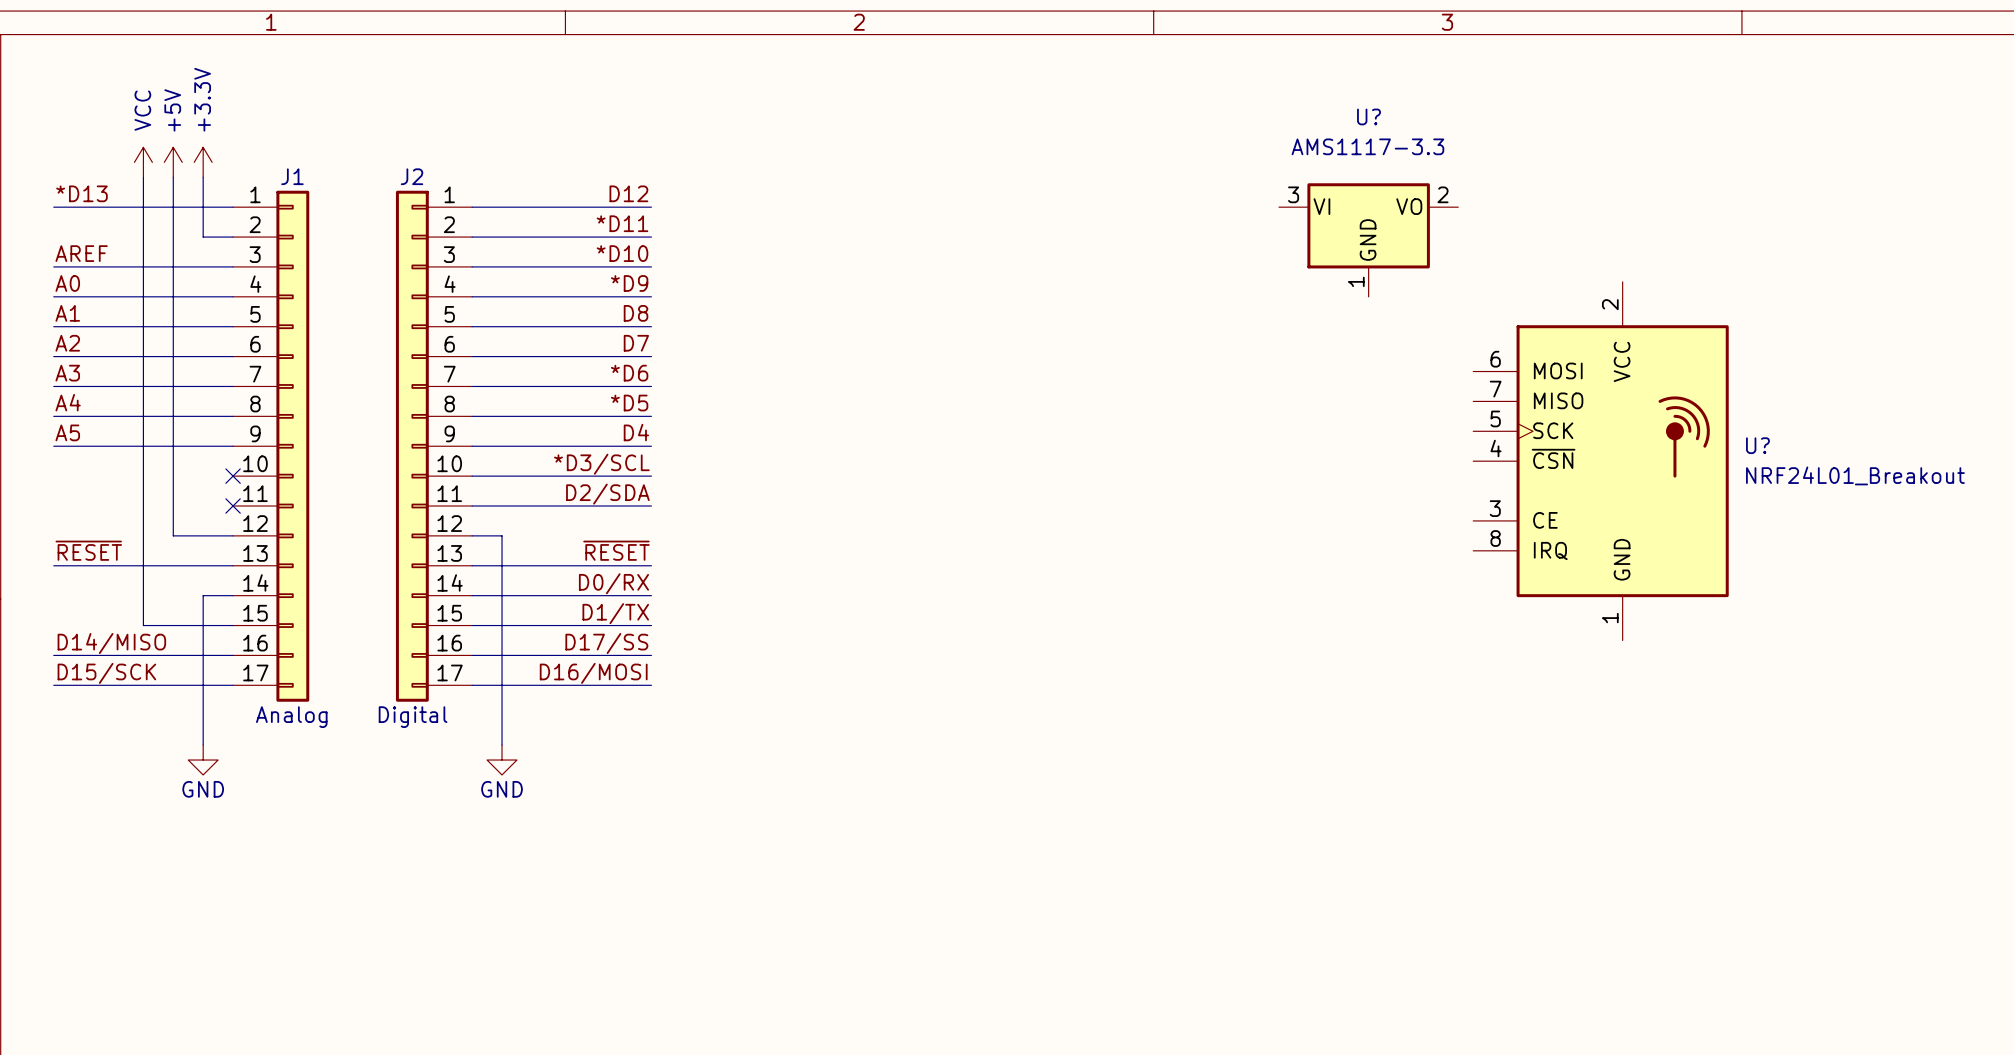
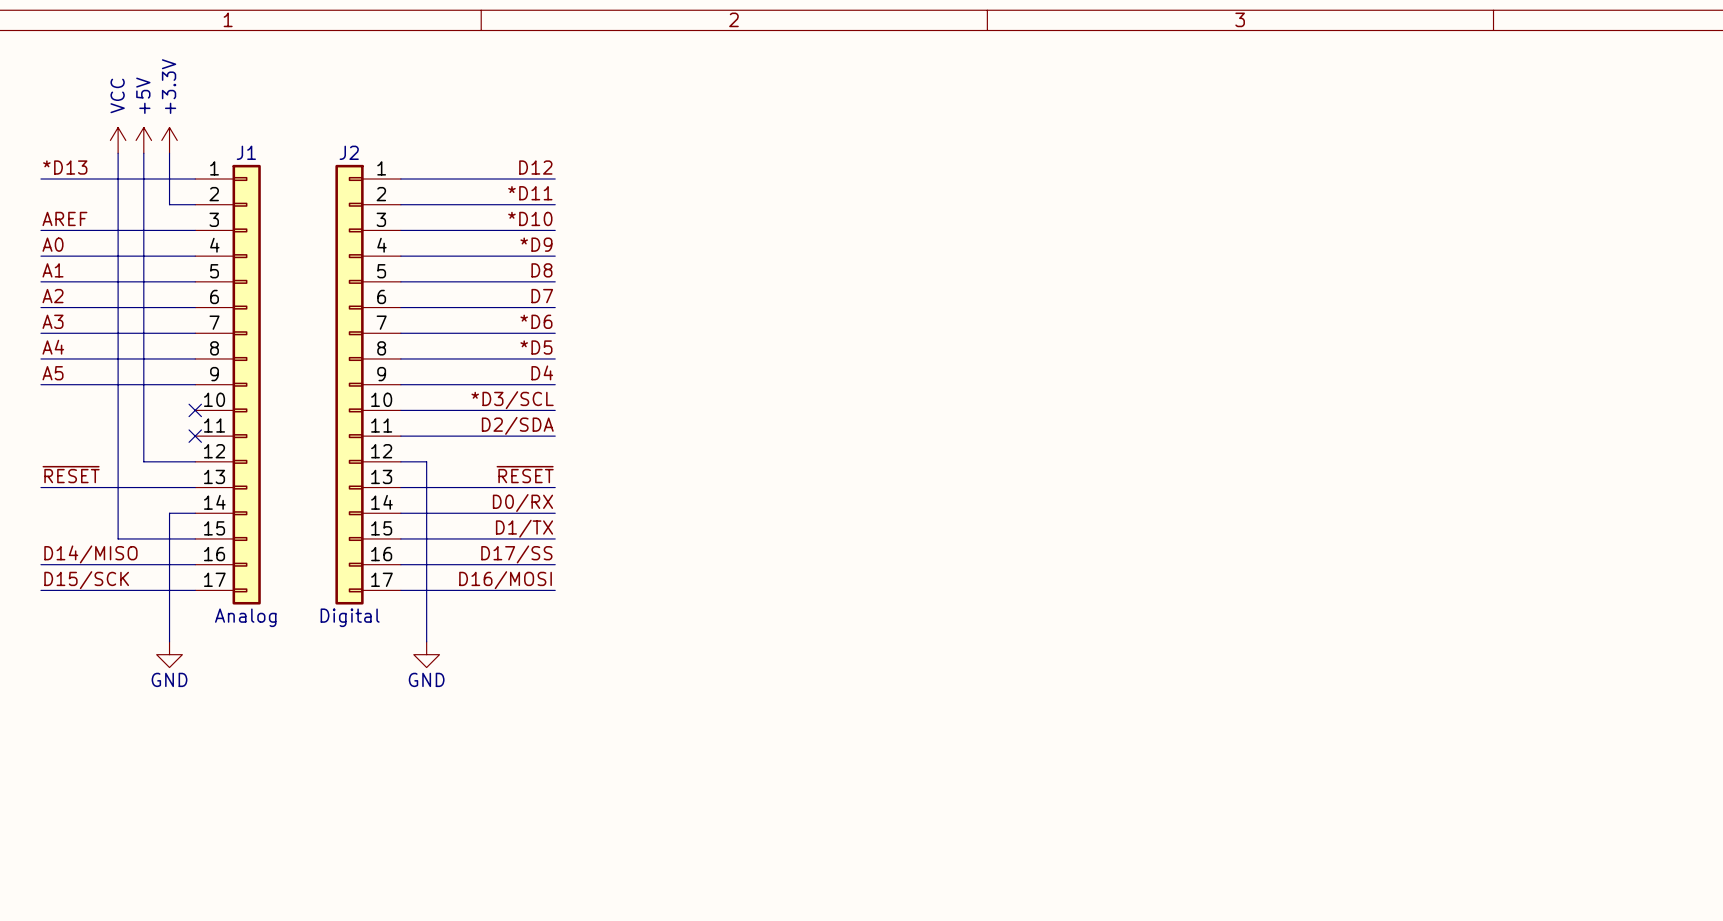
U?: AMS1117-3.3 (1368, 240) -> none
U?: NRF24L01_Breakout (1600, 461) -> none

